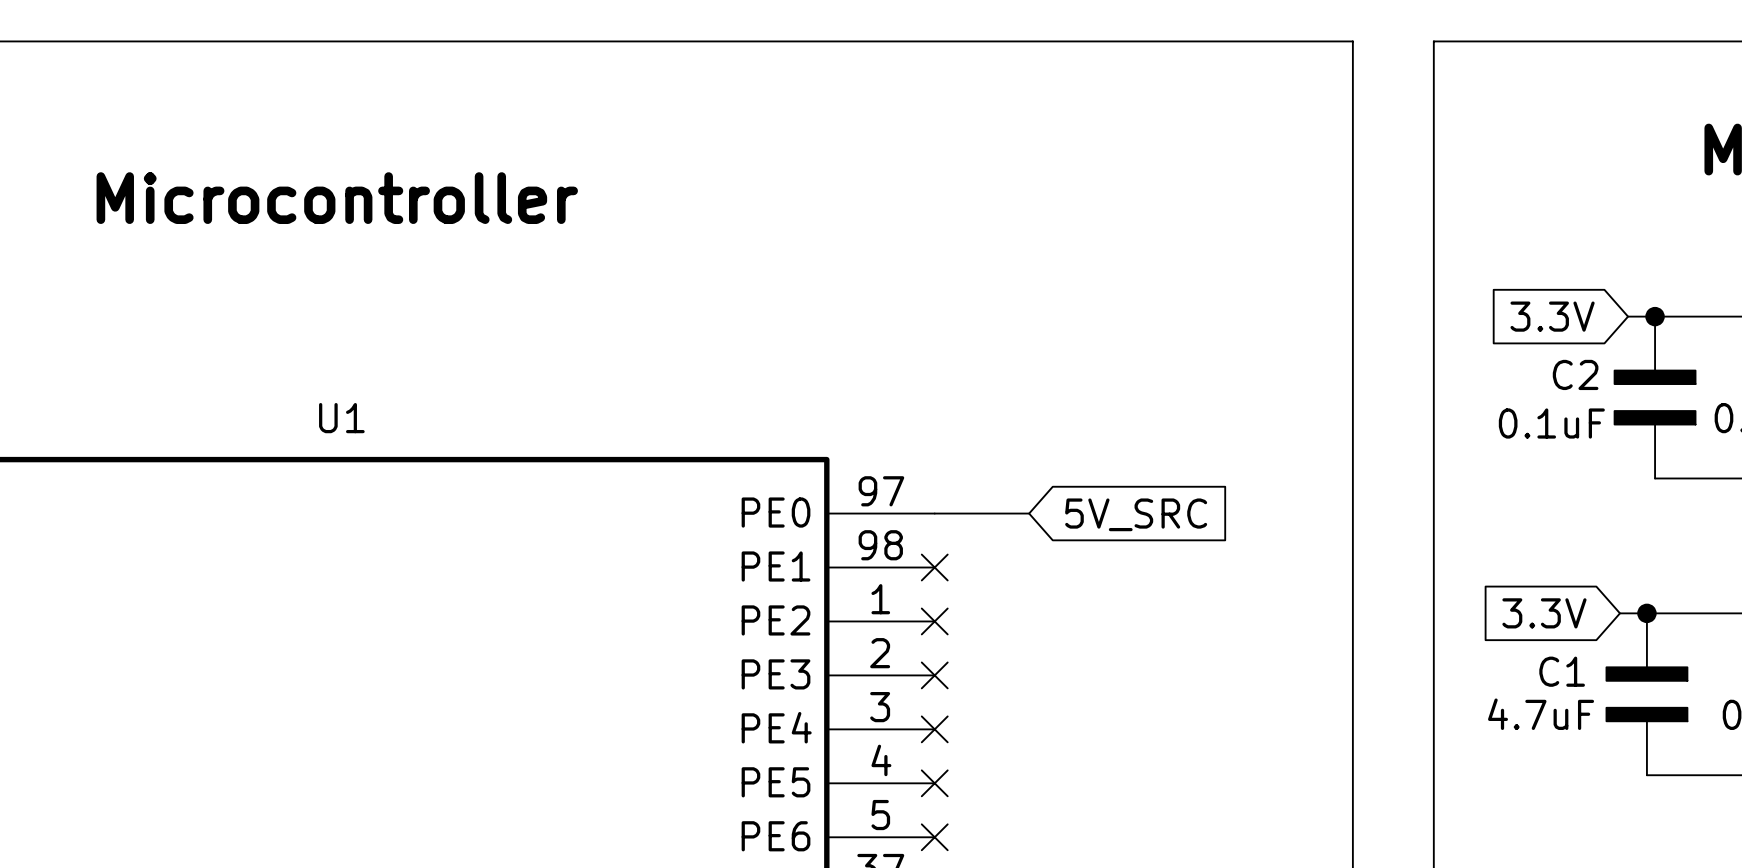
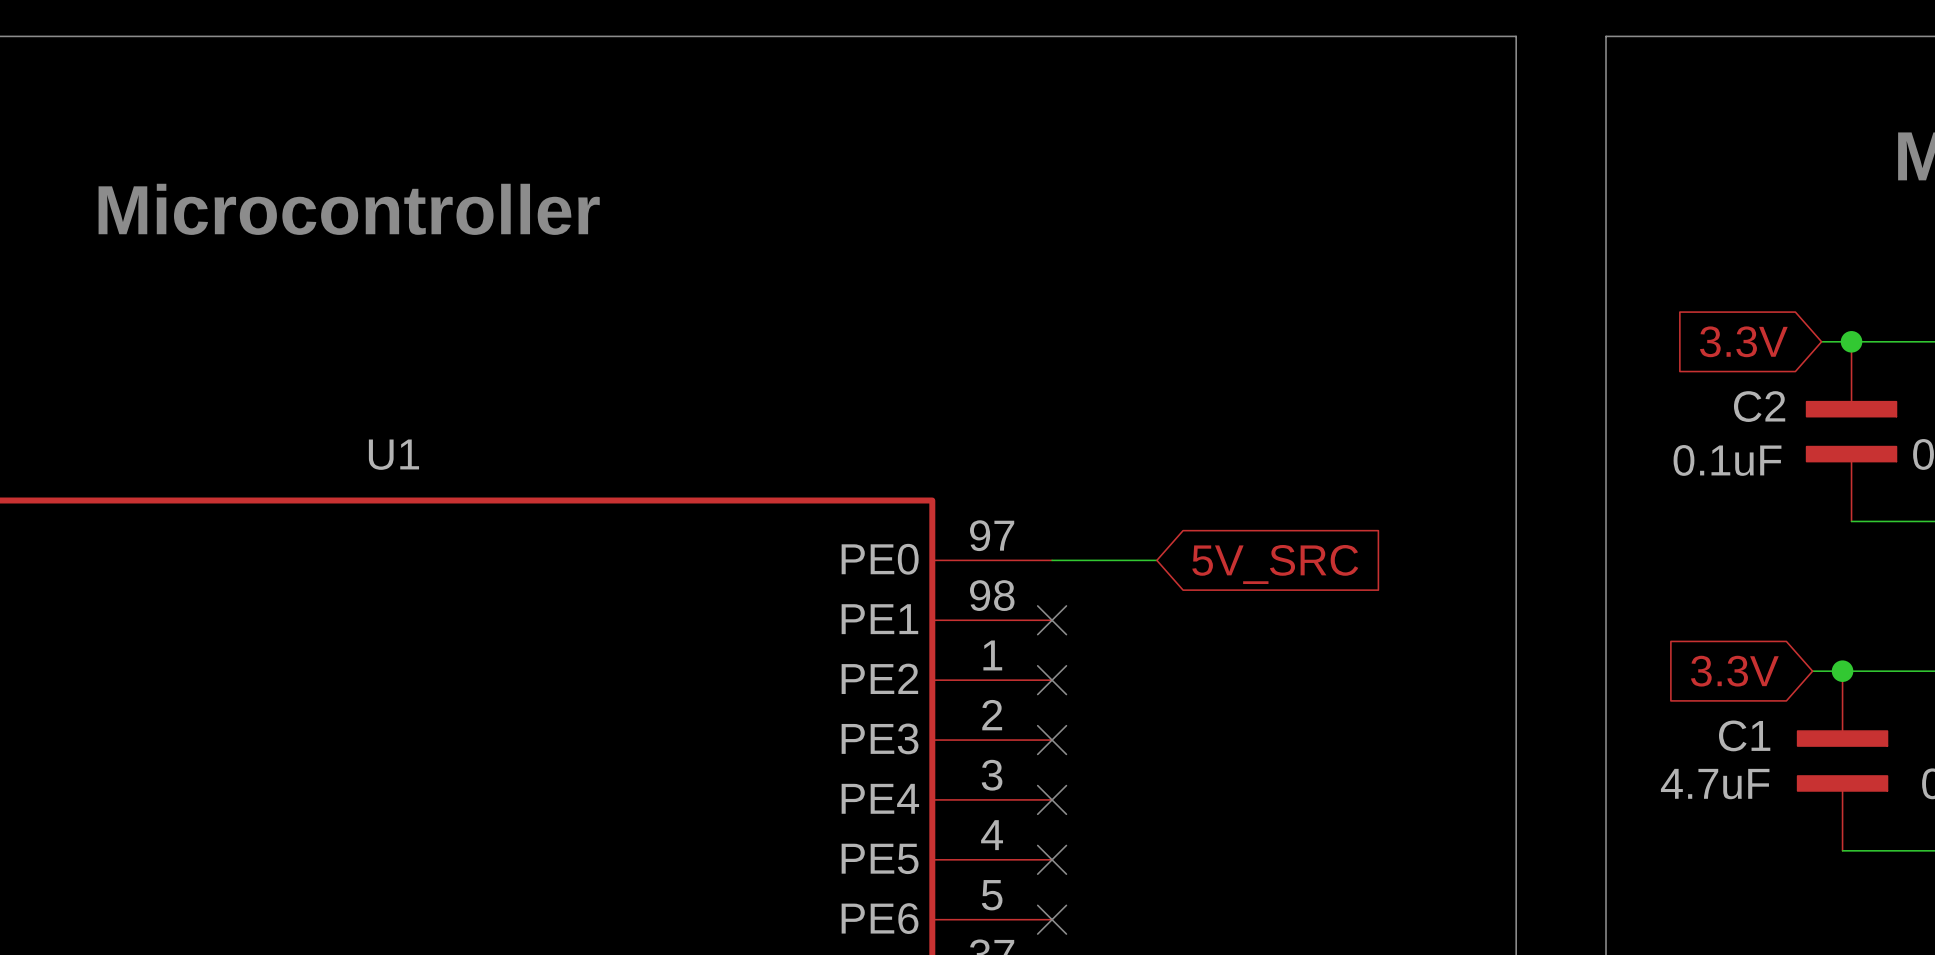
text position: Microcontroller (337, 198) -> Microcontroller (349, 209)

